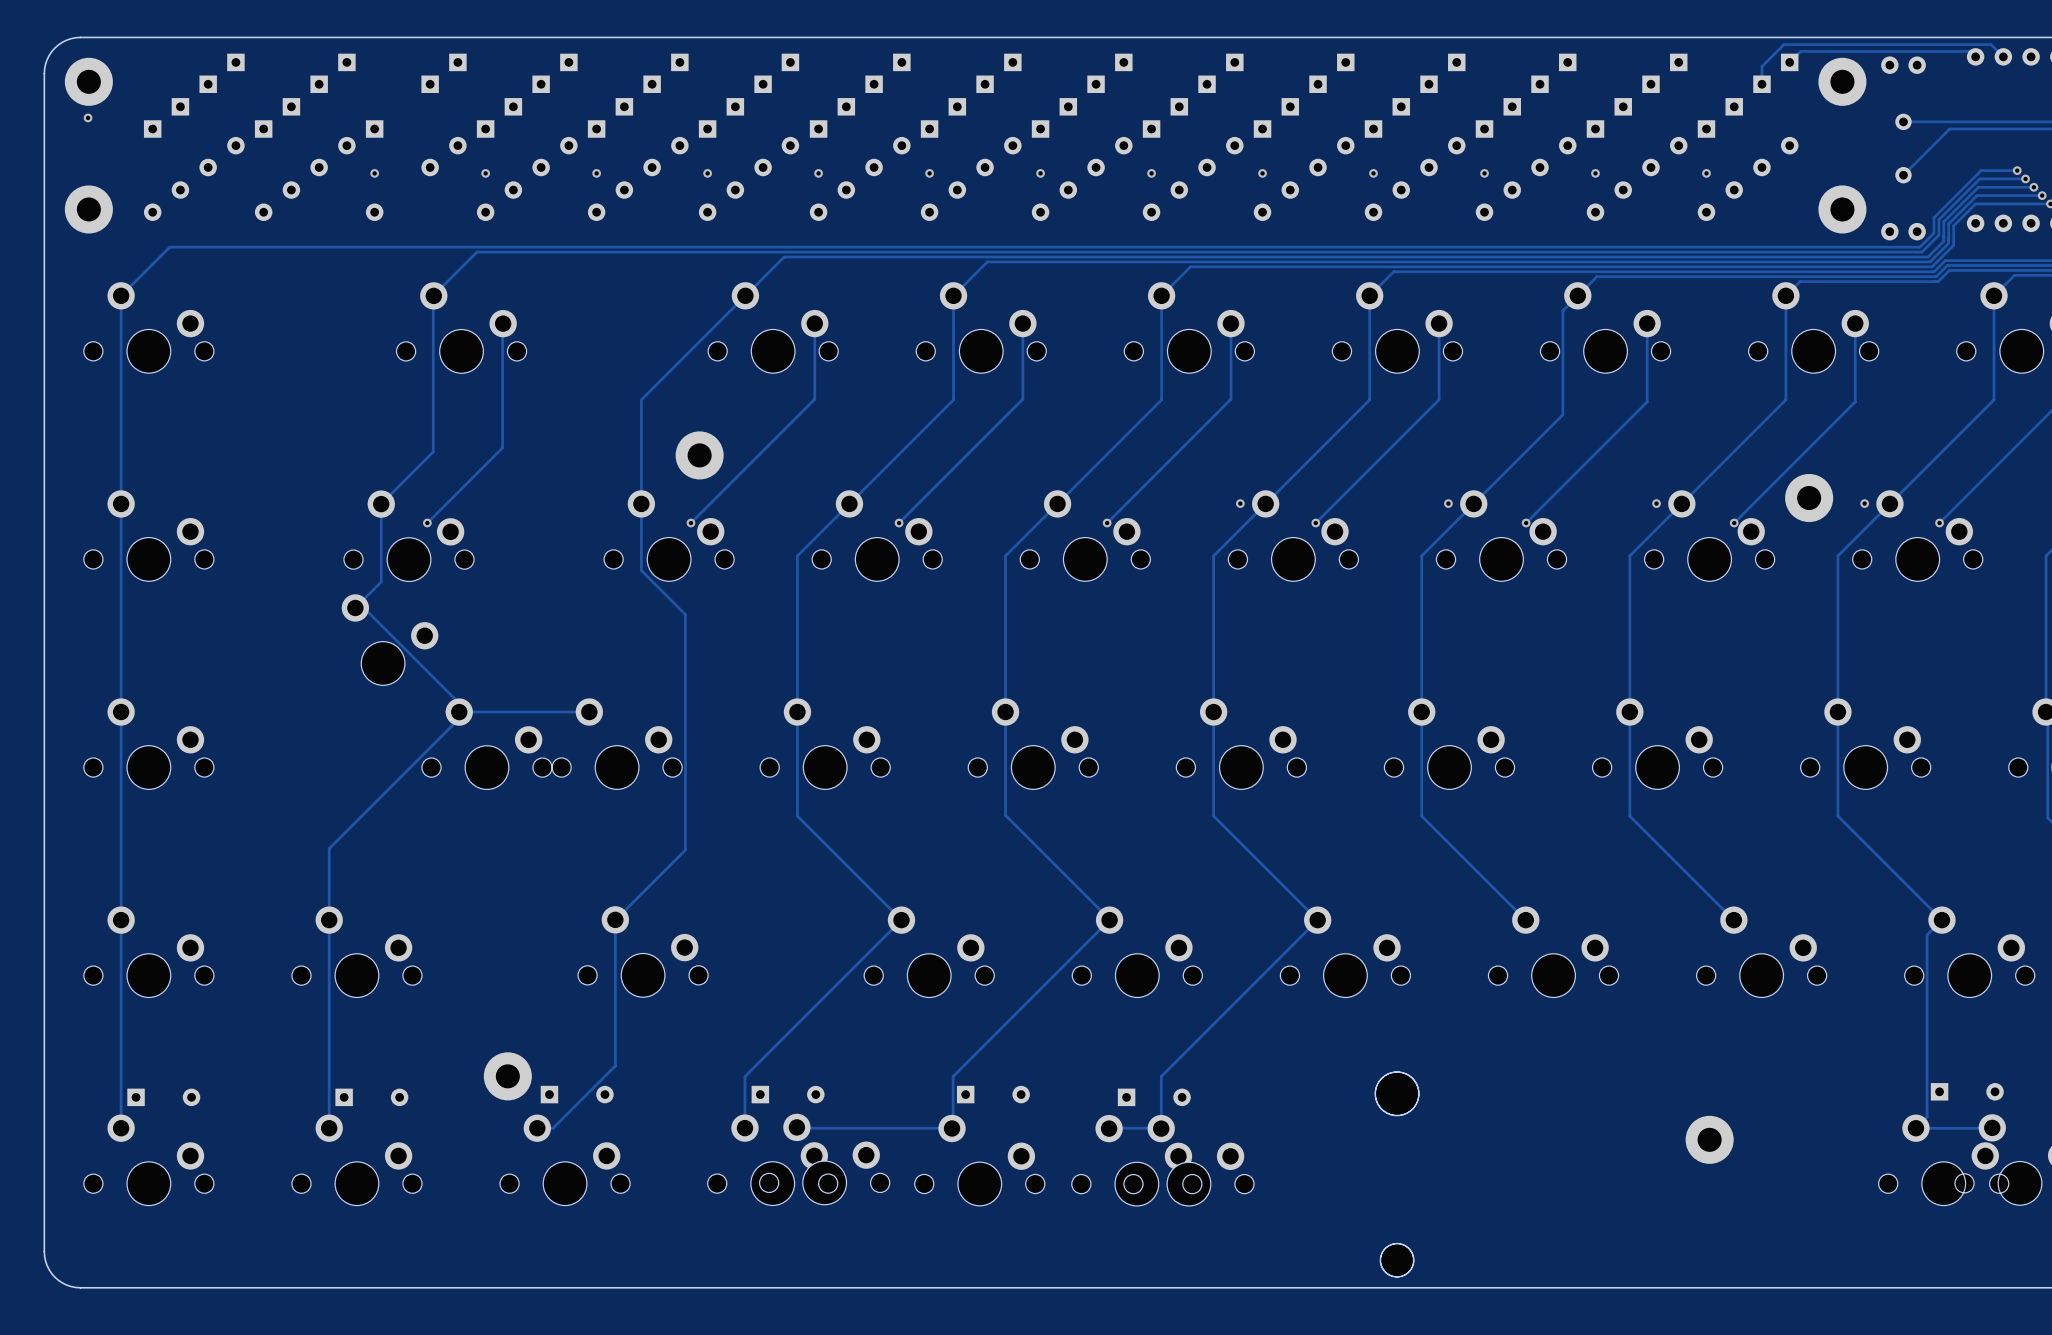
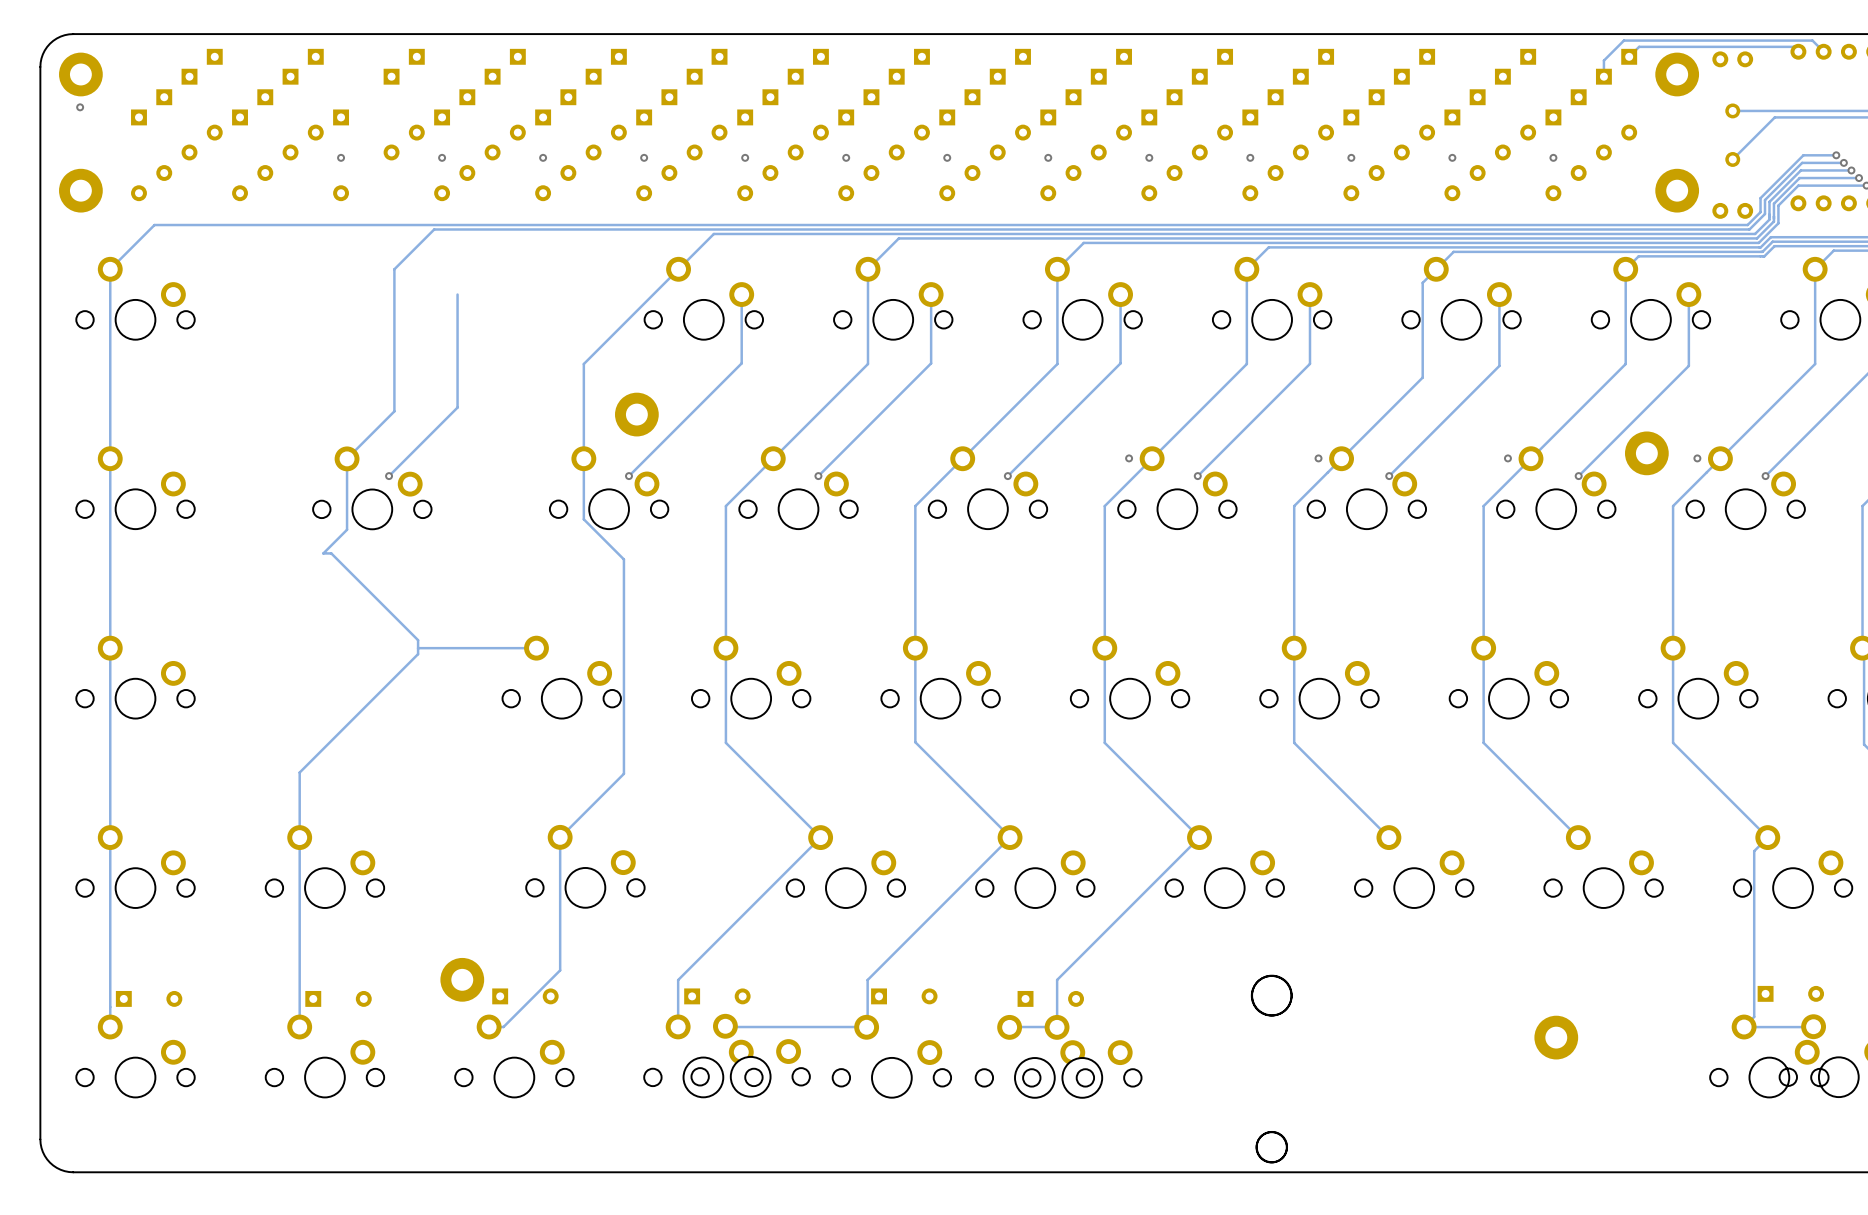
part: (461, 327) -> none
part: (390, 639) -> none
part: (487, 743) -> none

